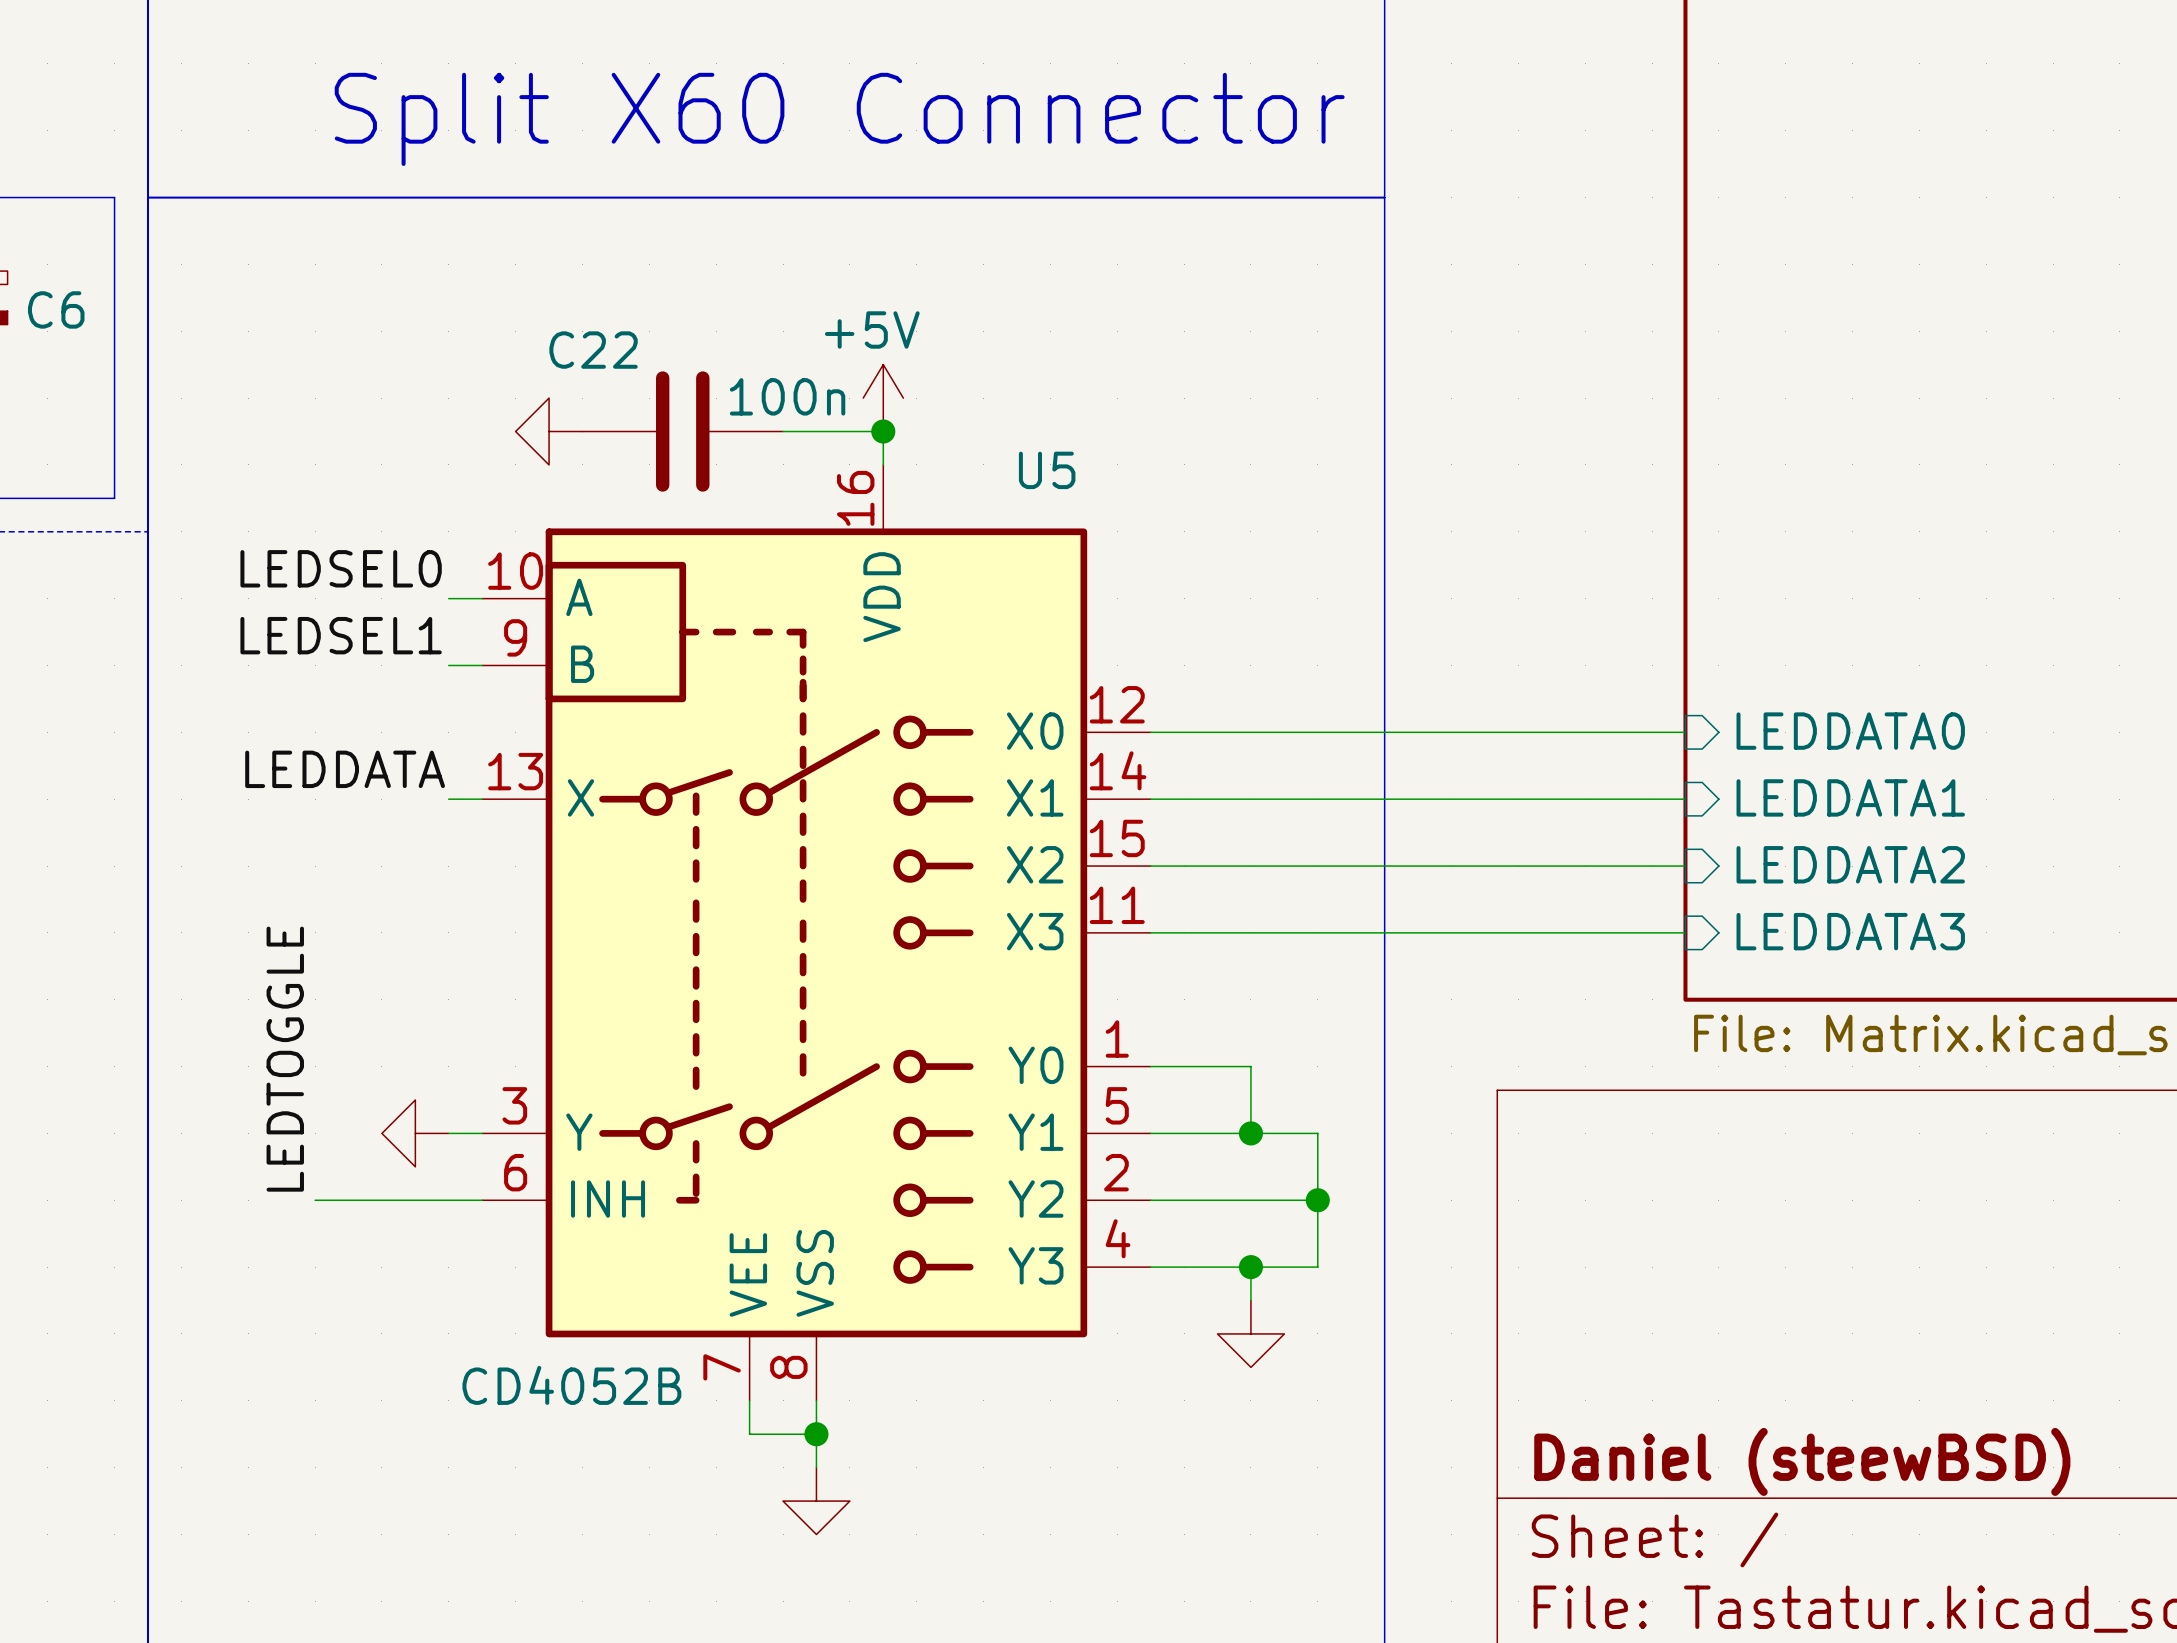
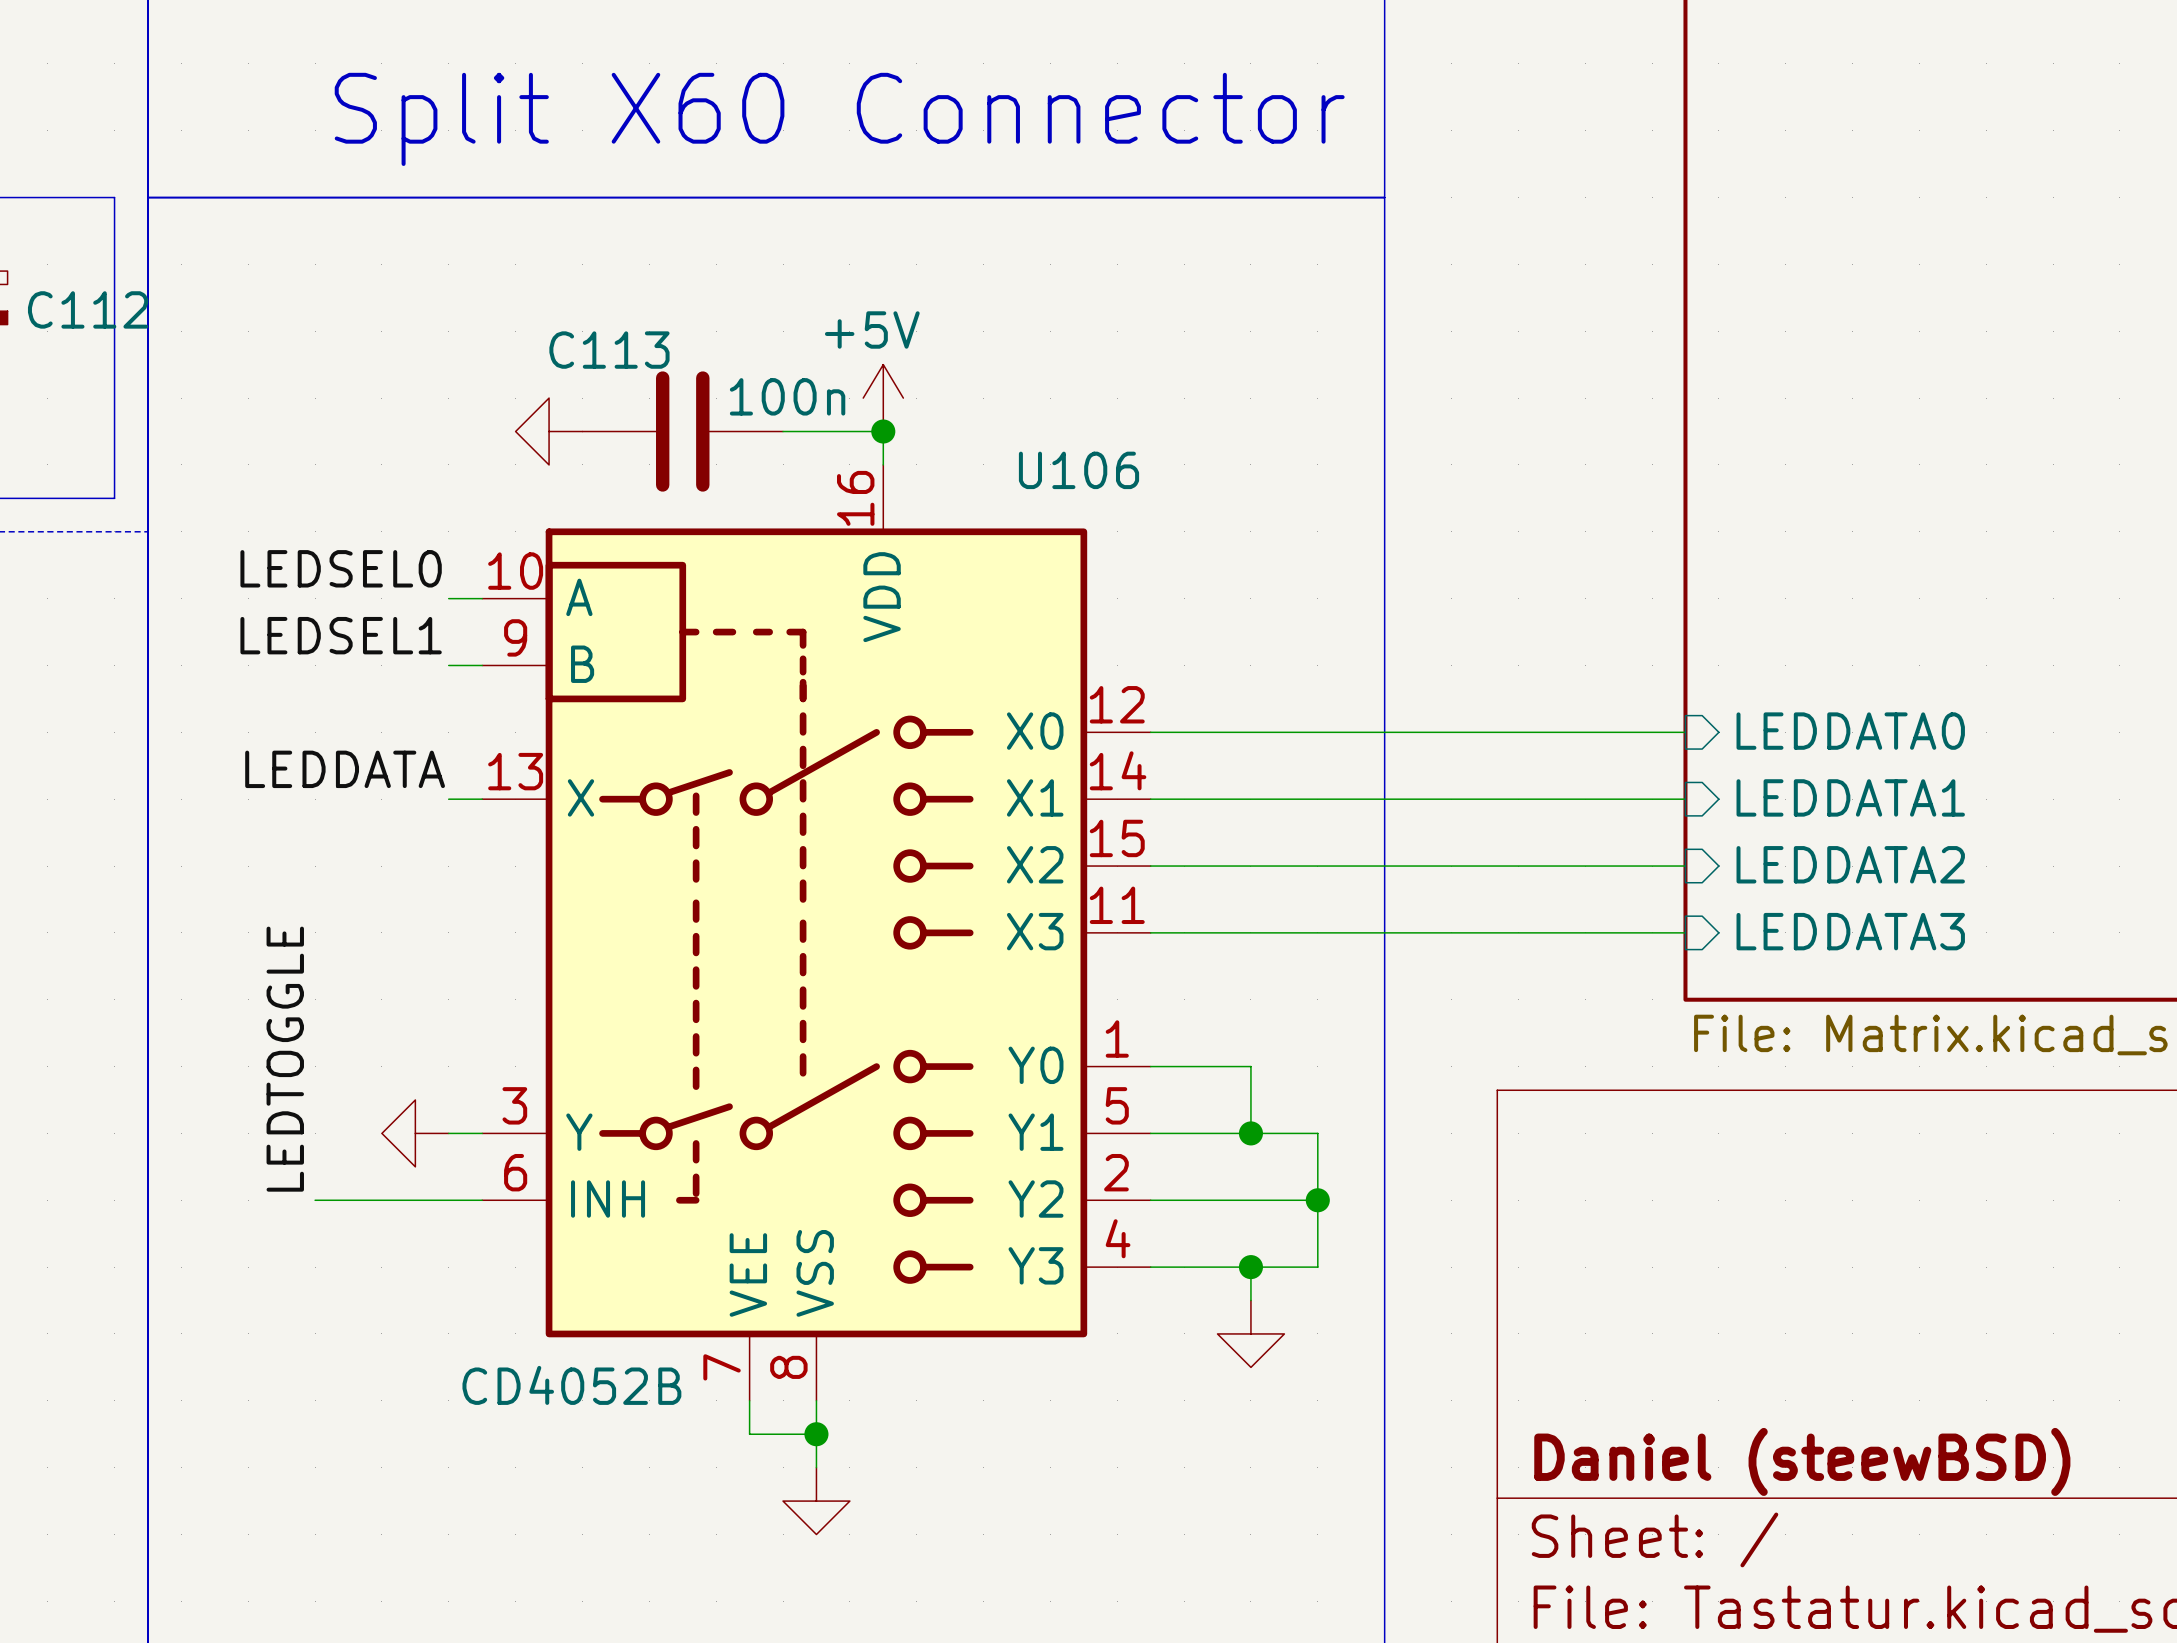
C6 name: C6 (56, 309) -> C112 (88, 309)
C22 name: C22 (593, 350) -> C113 (609, 350)
U5 name: U5 (1047, 470) -> U106 (1078, 470)

